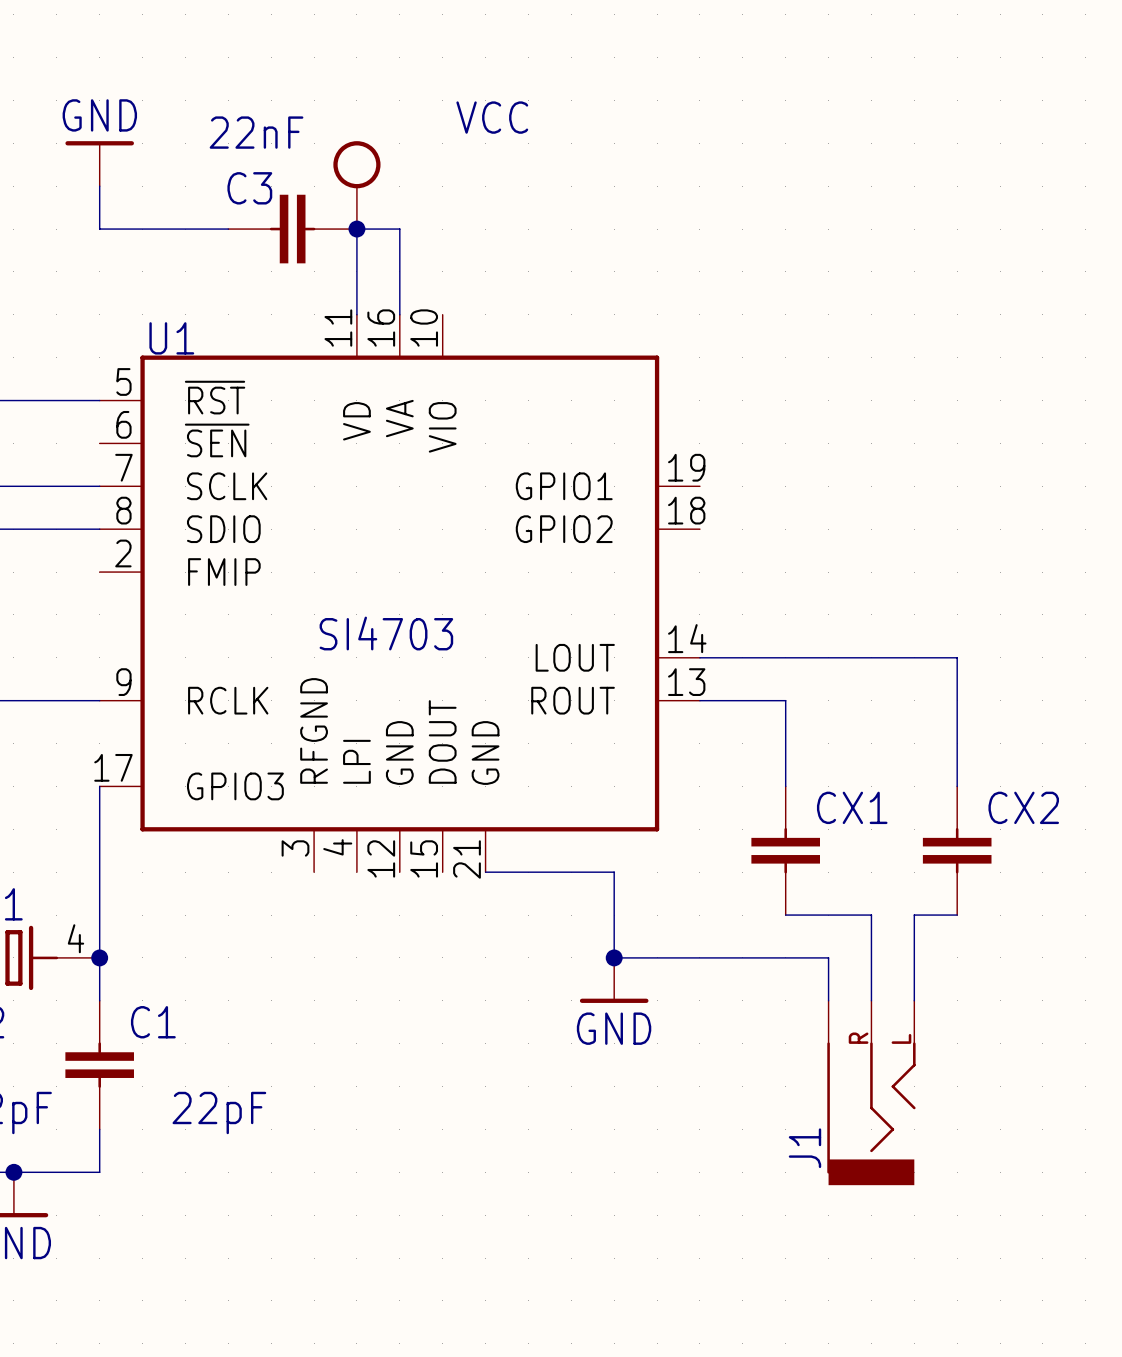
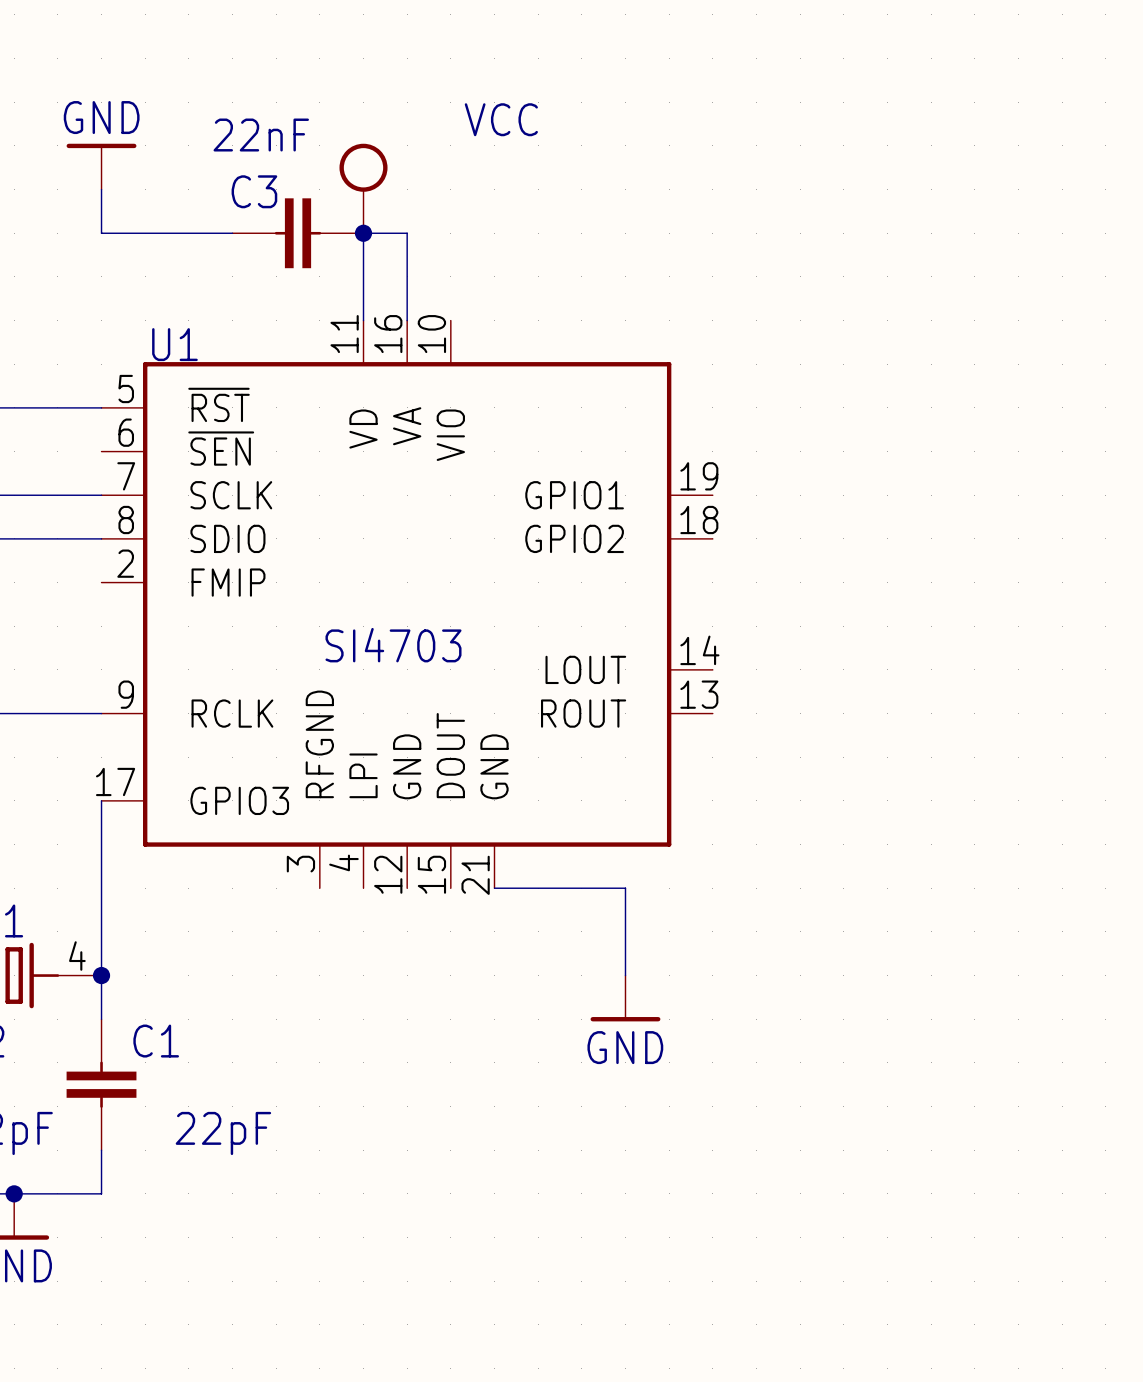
wire: (699, 657) (957, 657) (957, 786) -> none
wire: (699, 700) (785, 700) (785, 786) -> none
CX1: (785, 850) -> none
CX2: (957, 850) -> none
wire: (785, 915) (871, 915) (871, 1000) -> none
wire: (957, 915) (914, 915) (914, 1000) -> none
wire: (614, 957) (828, 957) (828, 1000) -> none
junction: (614, 957) -> none
J1: (871, 1092) -> none

